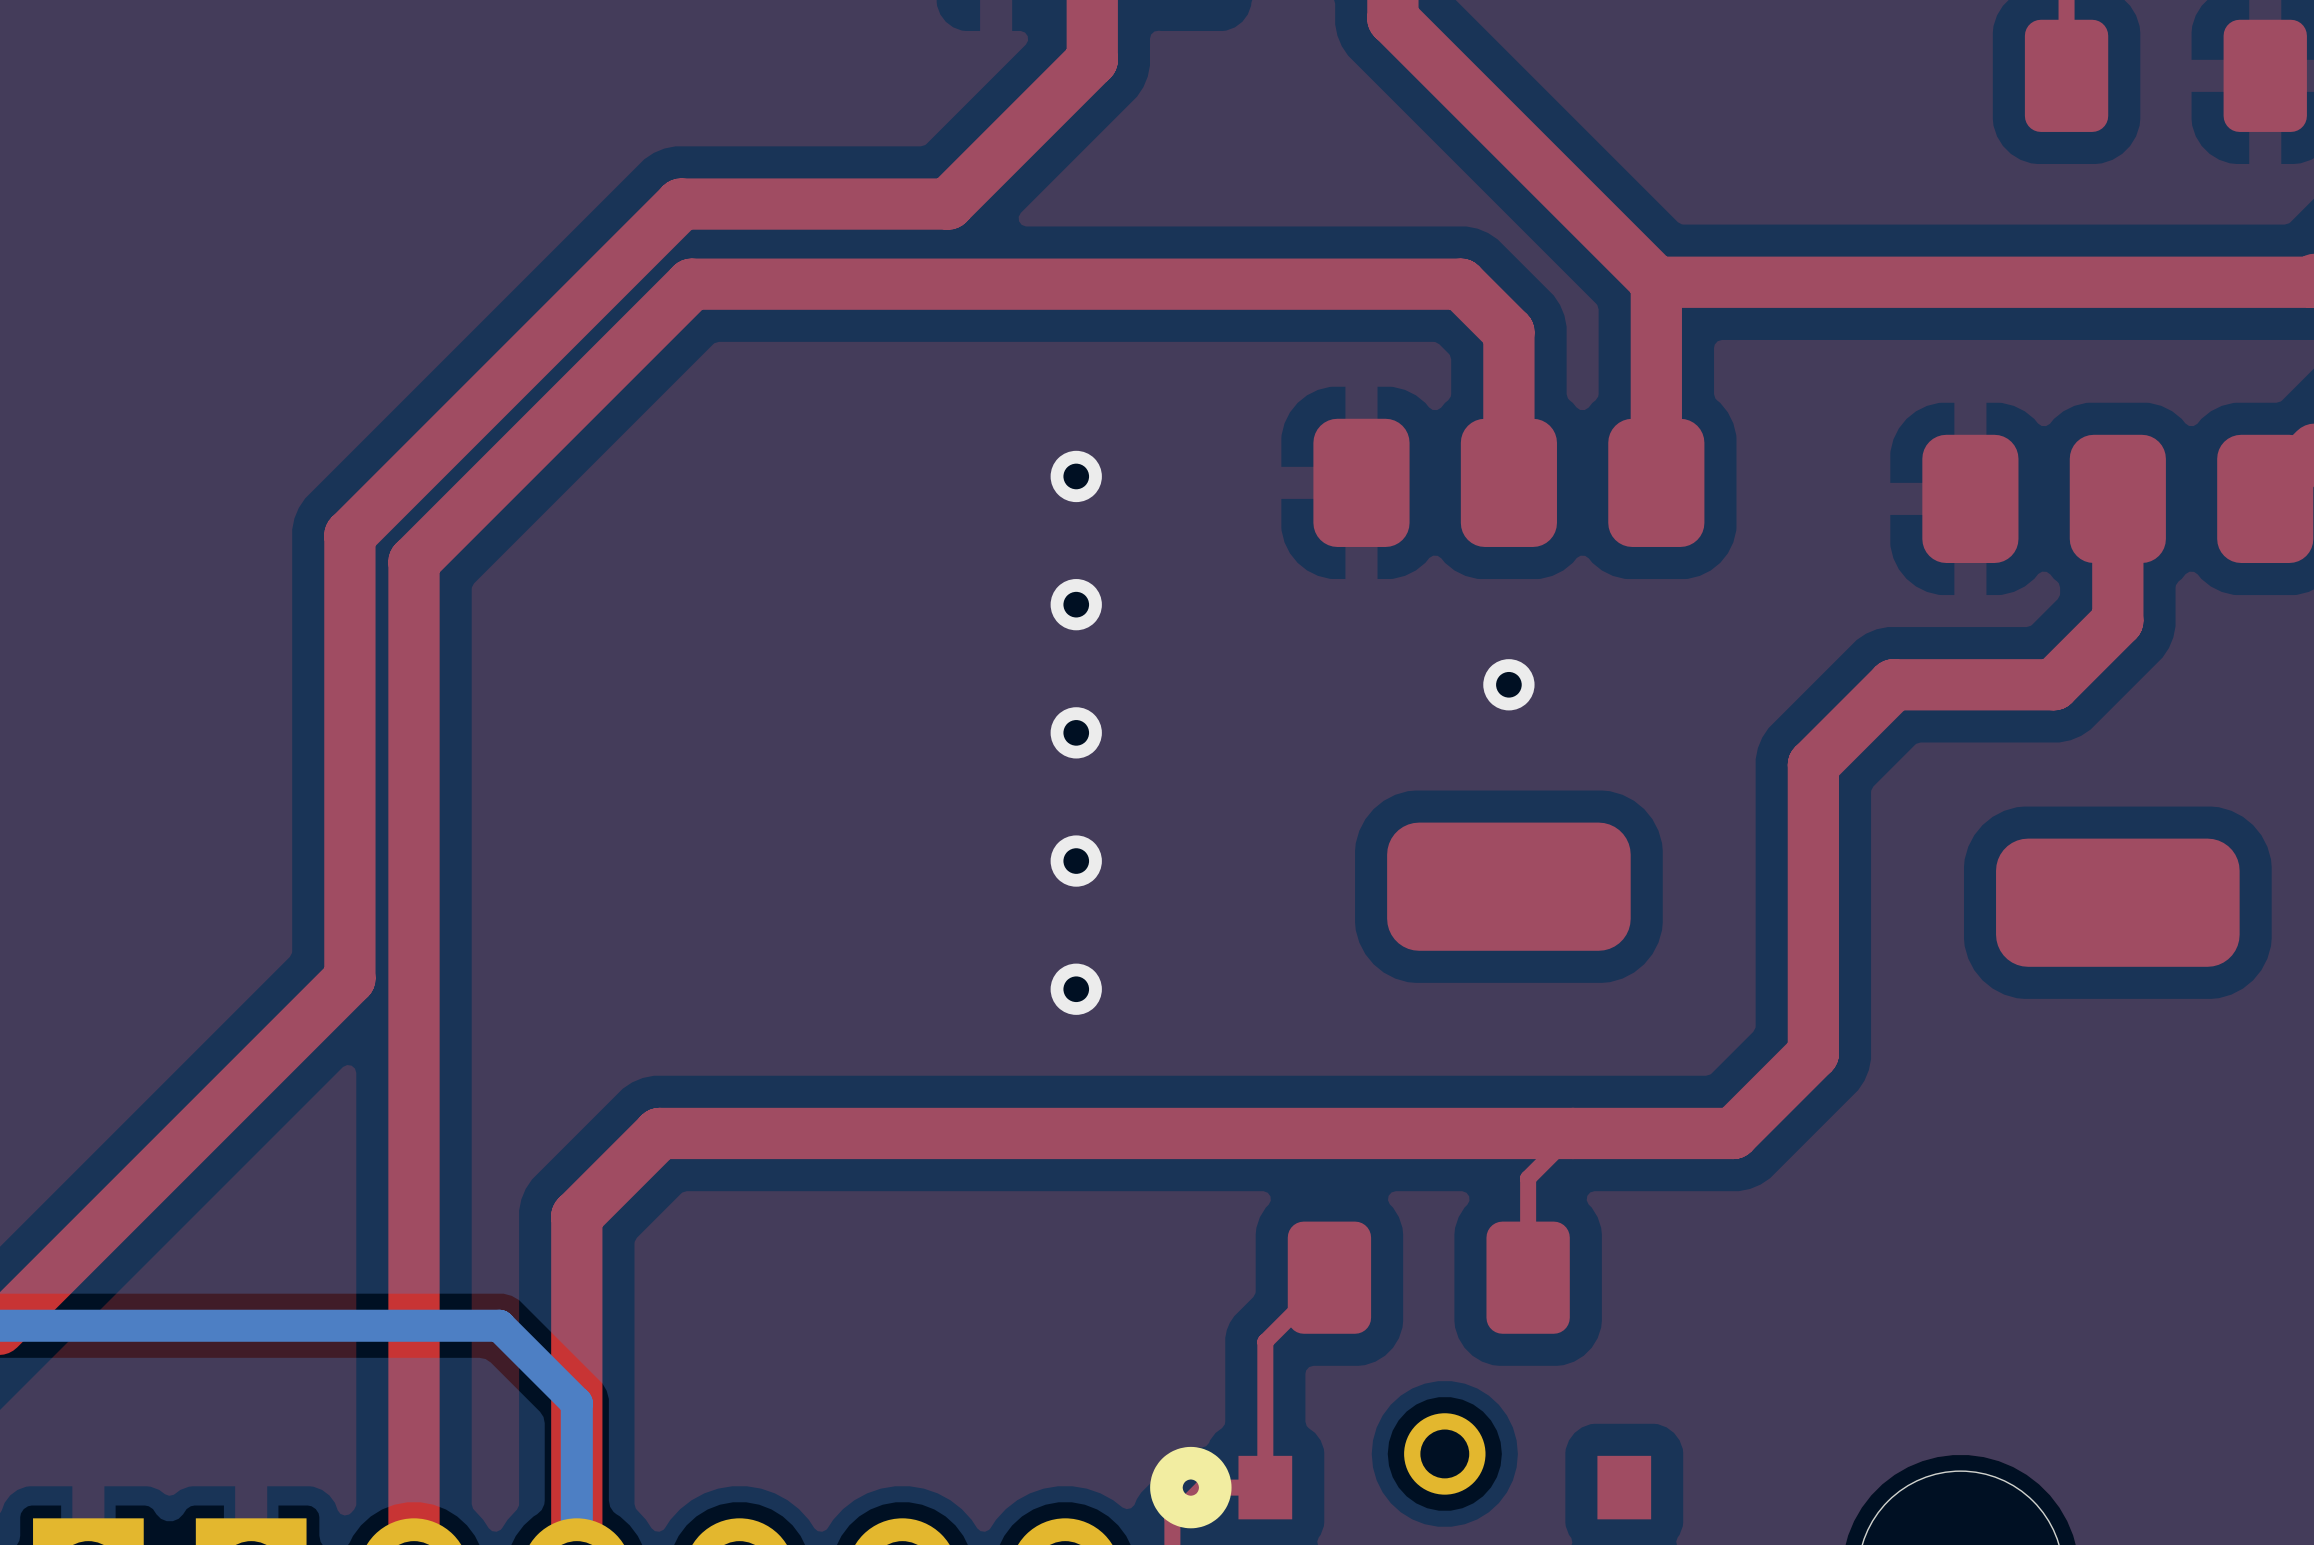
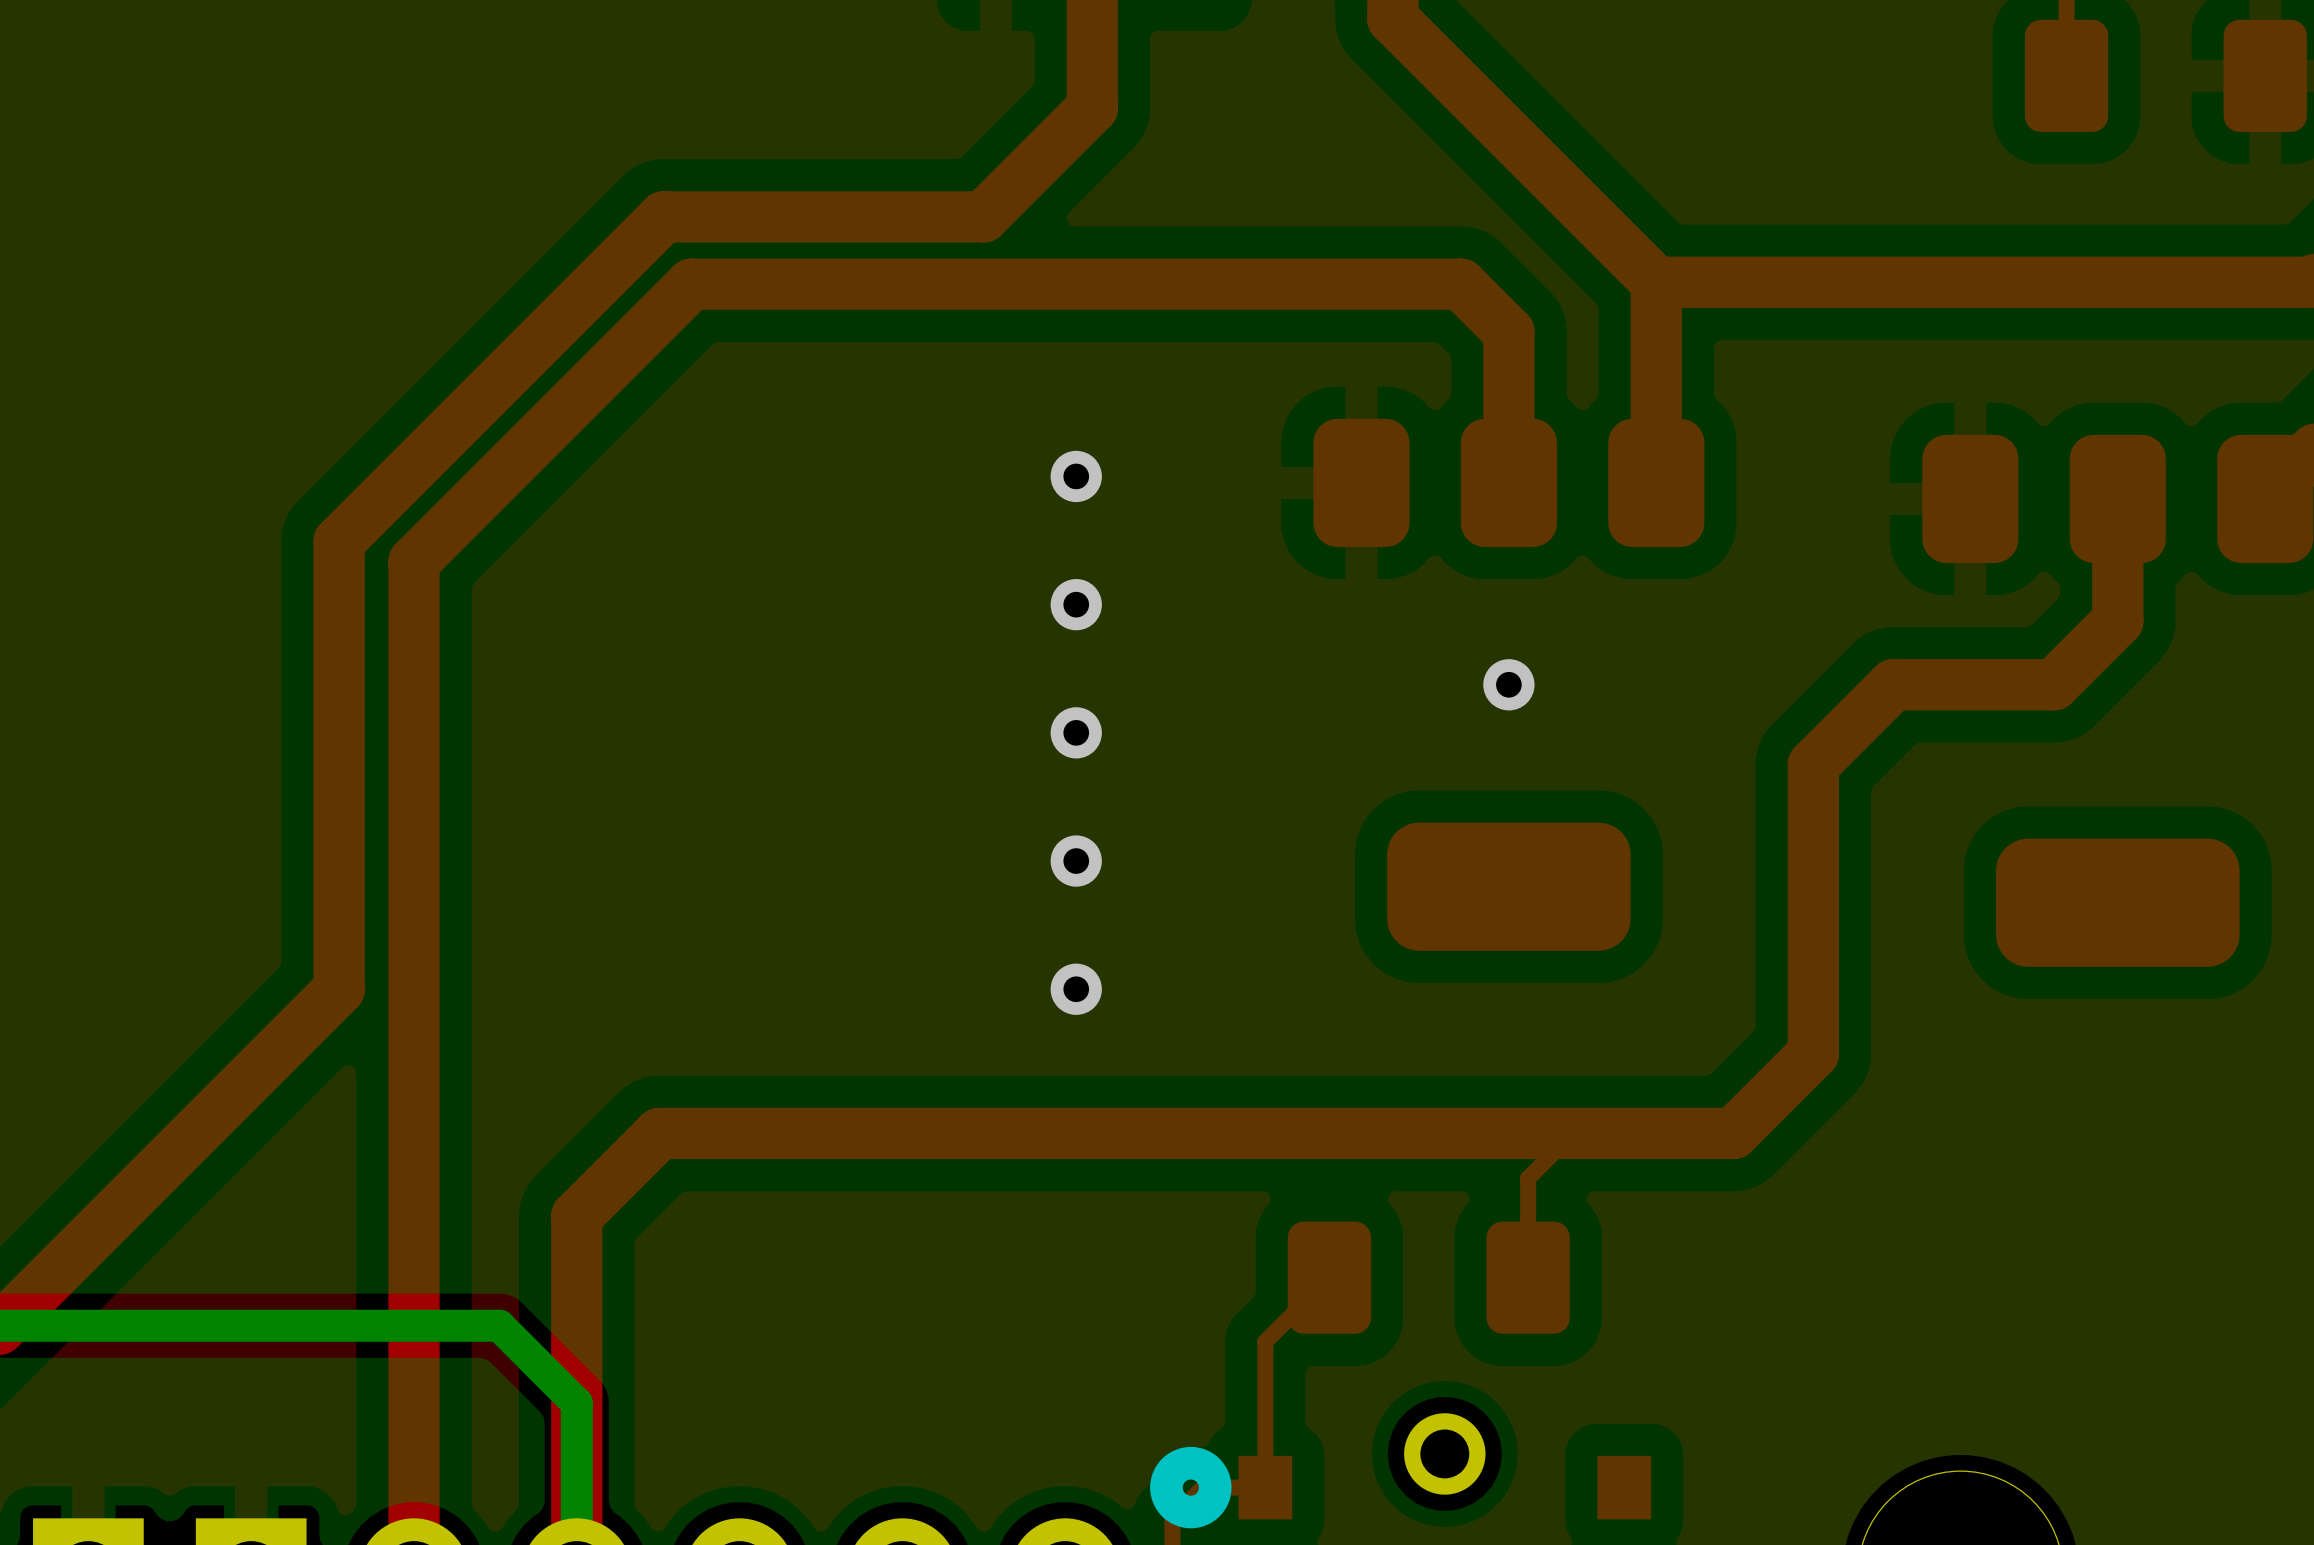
top track: (1092, 59) (948, 204) (681, 204) (349, 535) (349, 978) (339, 989) -> (1092, 59) (1092, 107) (983, 216) (663, 216) (339, 541) (339, 989)

